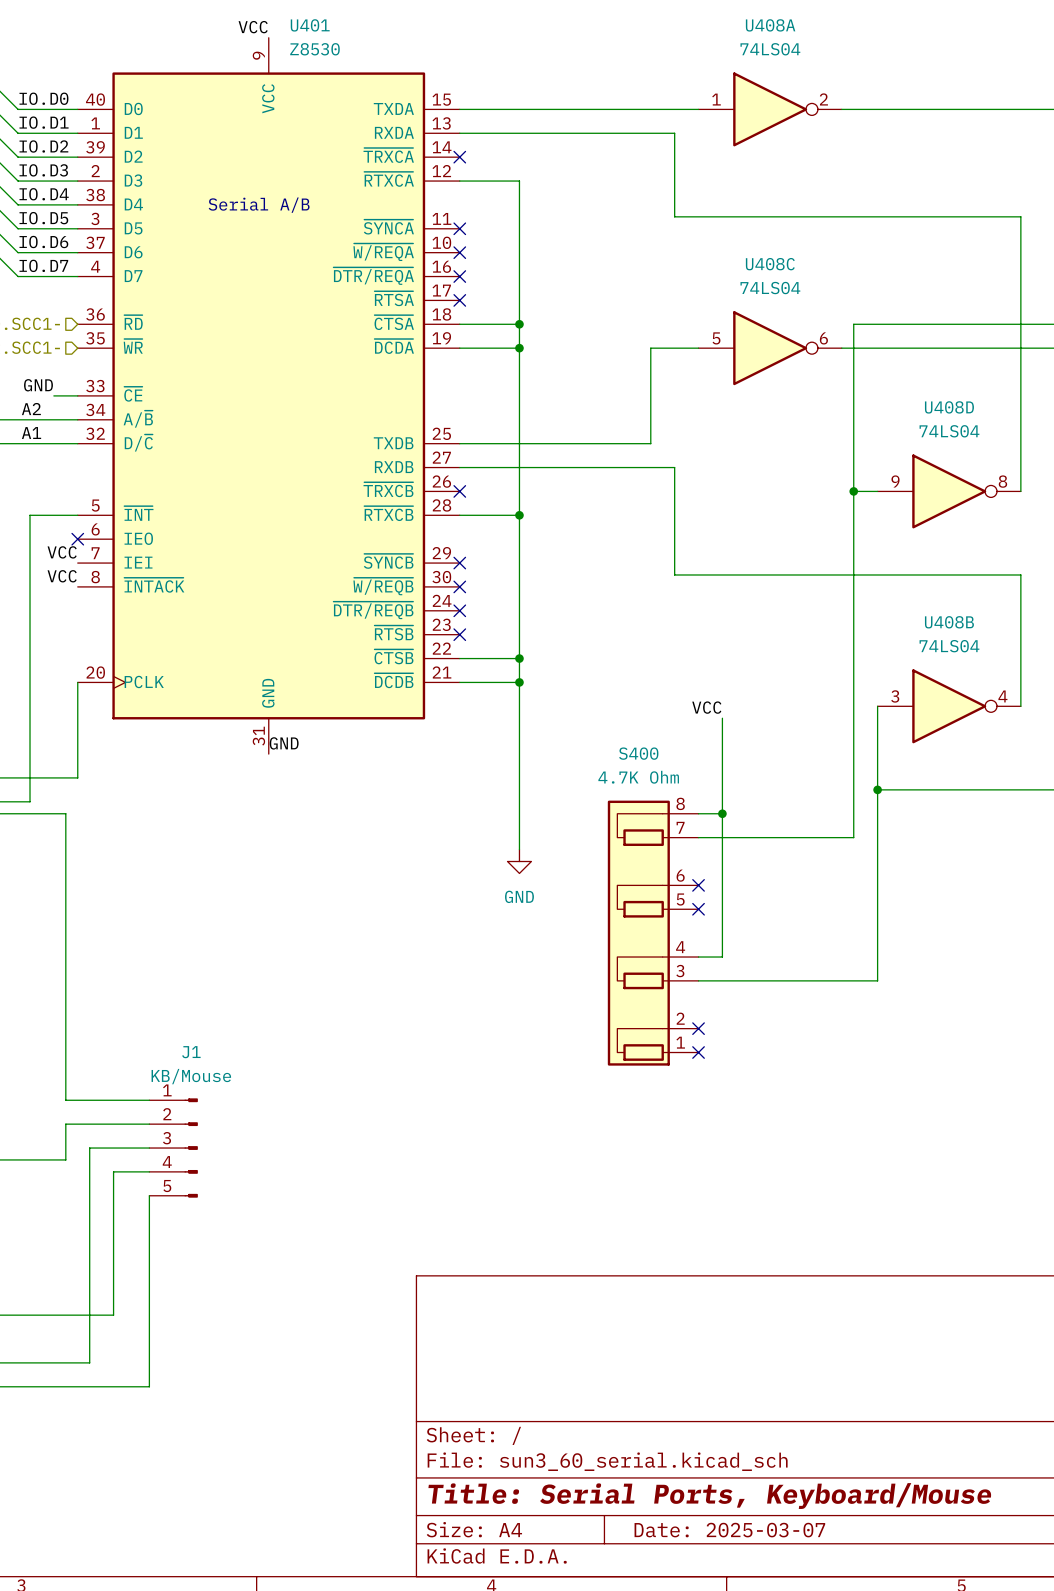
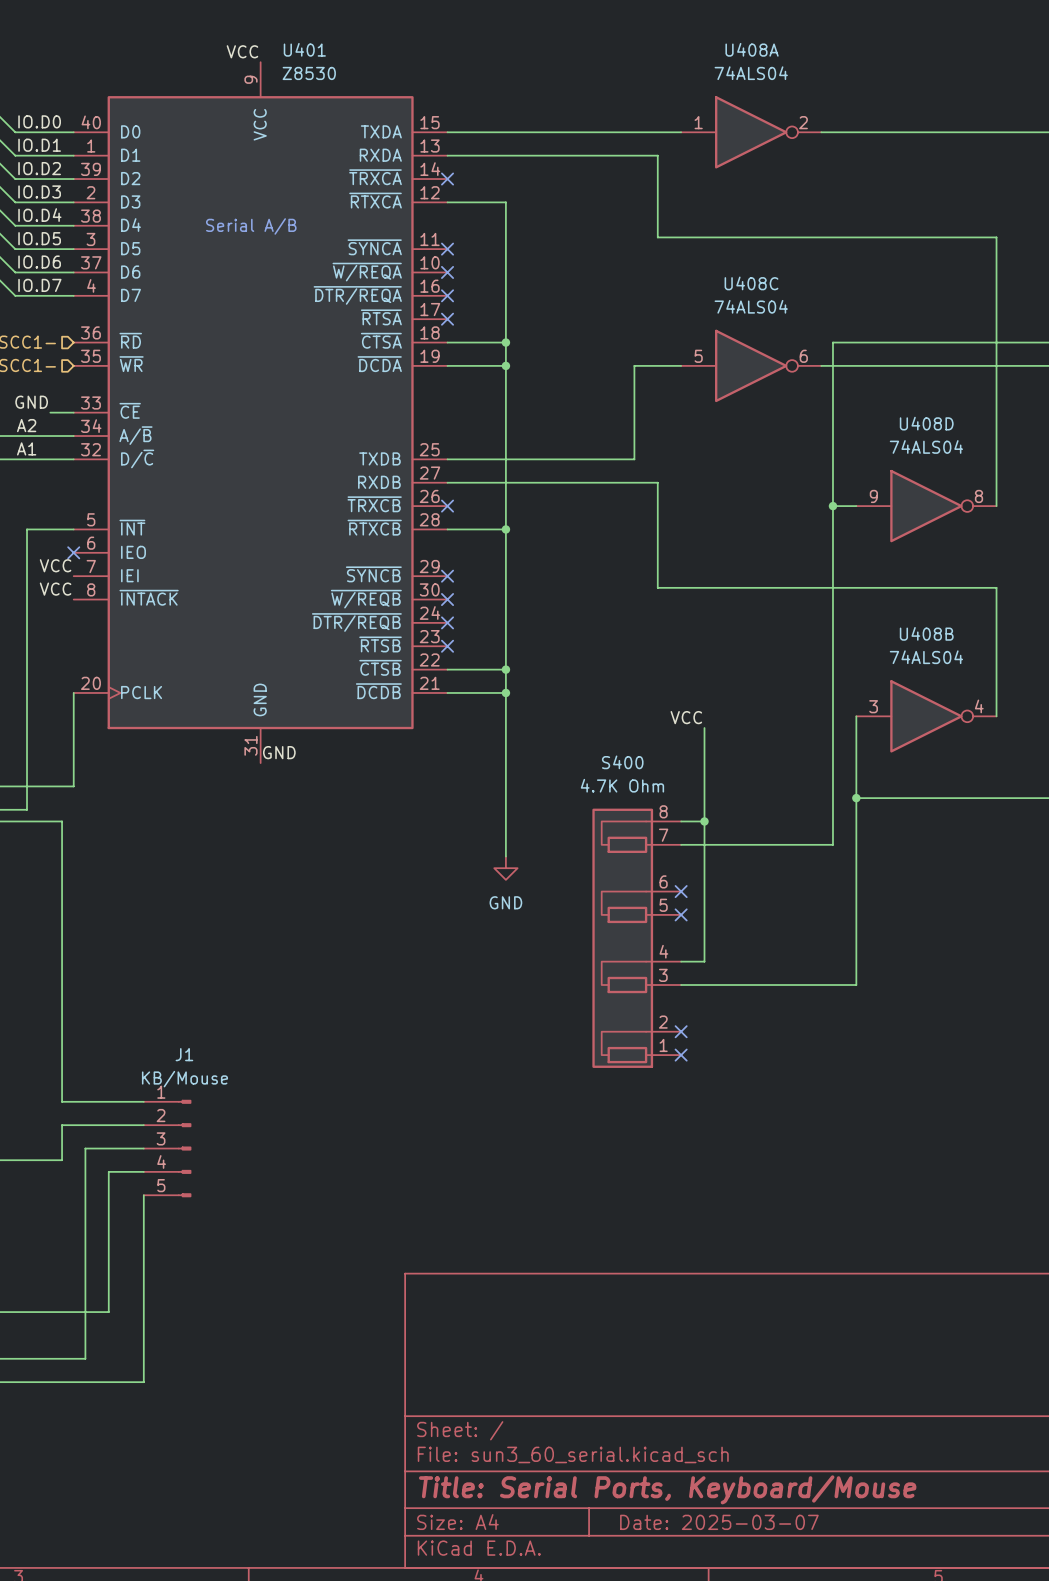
U408A value: 74LS04 (770, 49) -> 74ALS04 (751, 73)
U408C value: 74LS04 (770, 288) -> 74ALS04 (751, 306)
U408D value: 74LS04 (949, 431) -> 74ALS04 (926, 446)
U408B value: 74LS04 (949, 646) -> 74ALS04 (926, 657)

